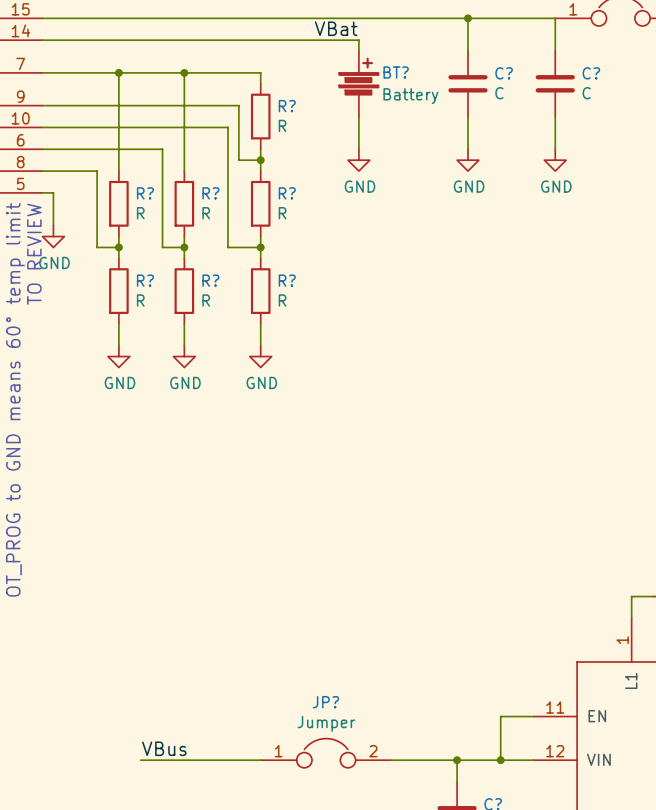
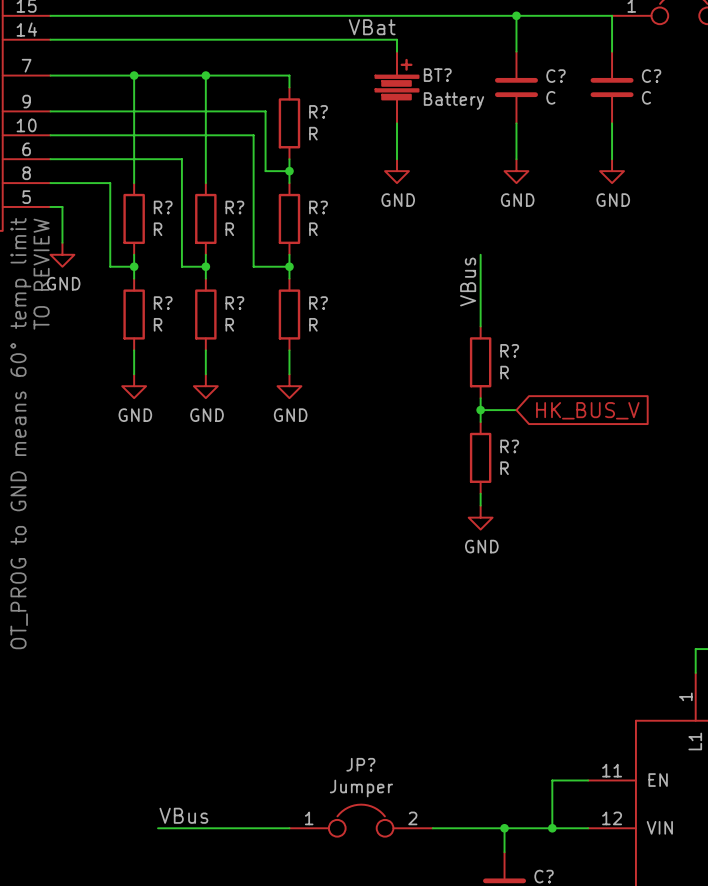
wire: none -> (480, 254) (480, 326)
label: none -> VBus (468, 282)
R?: none -> R (480, 362)
wire: none -> (480, 398) (480, 422)
wire: none -> (480, 410) (516, 410)
junction: none -> (480, 410)
global label: none -> HK_BUS_V (587, 410)
R?: none -> R (480, 457)
wire: none -> (480, 493) (480, 505)
power symbol: none -> GND (480, 517)

